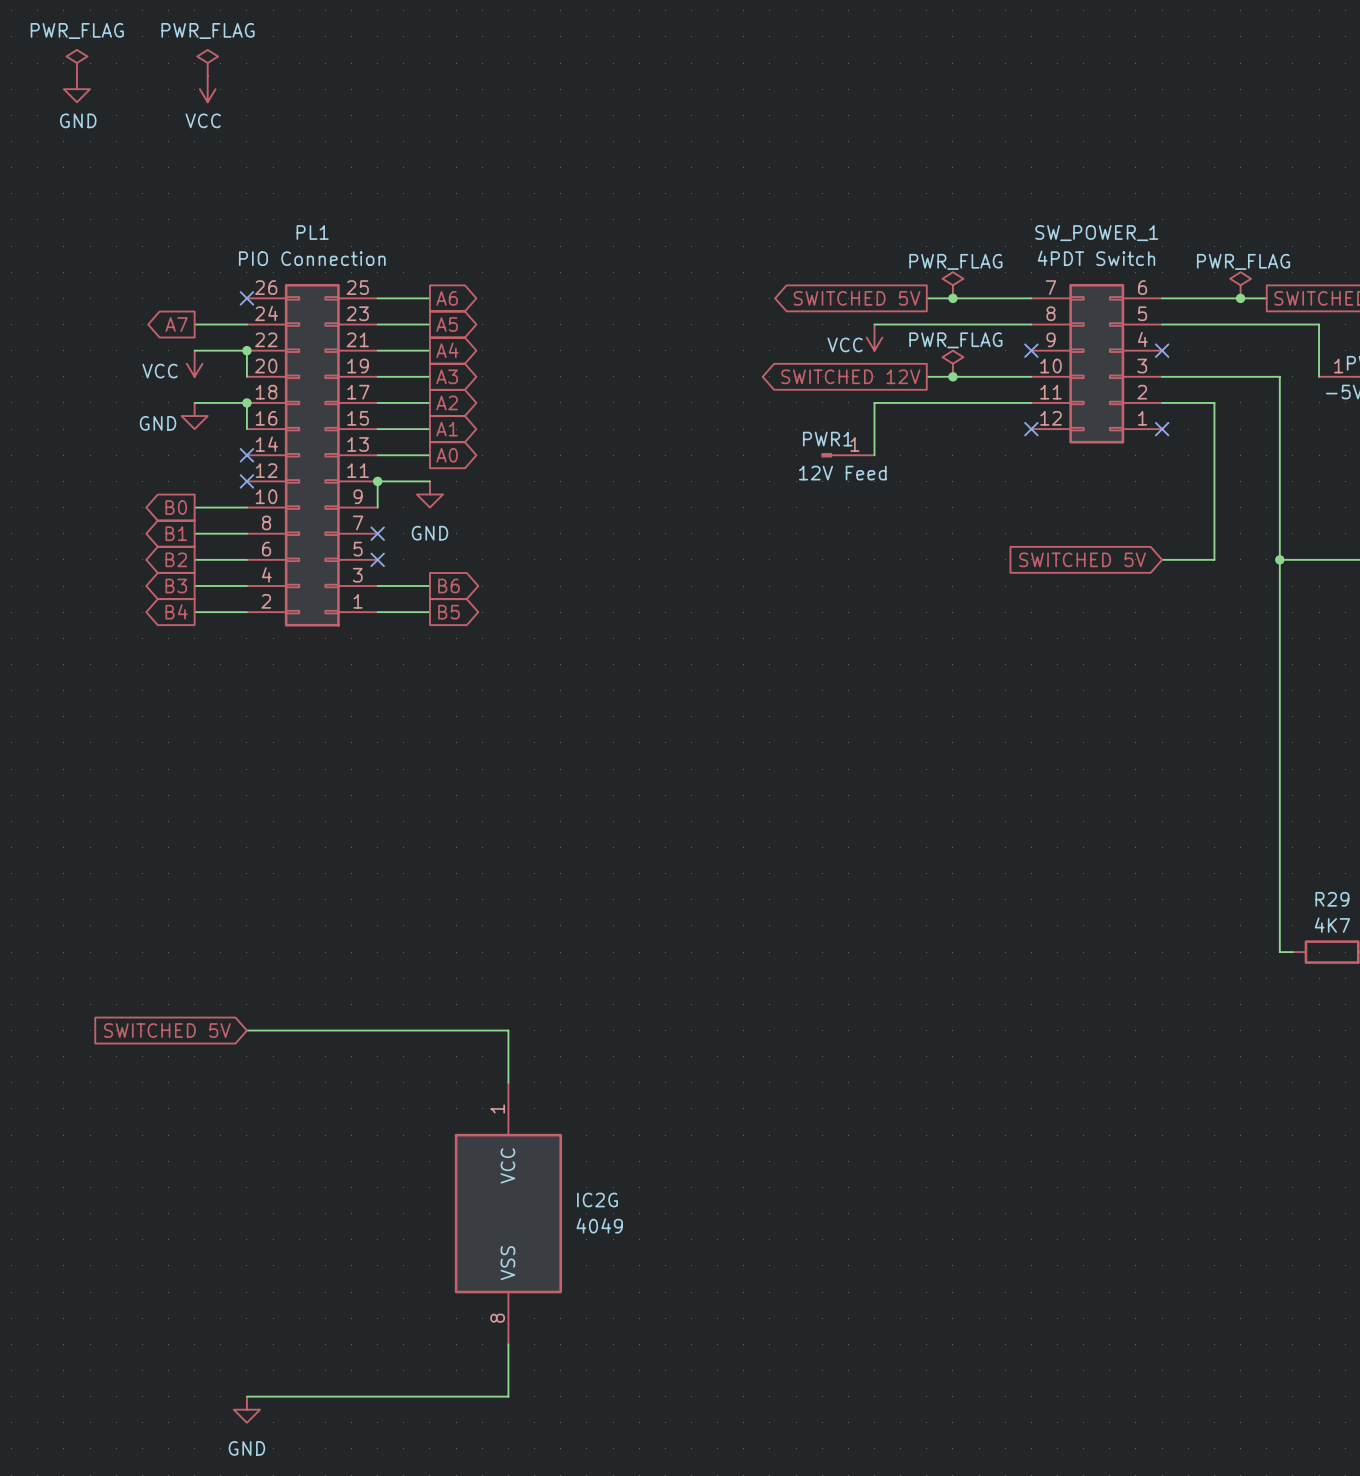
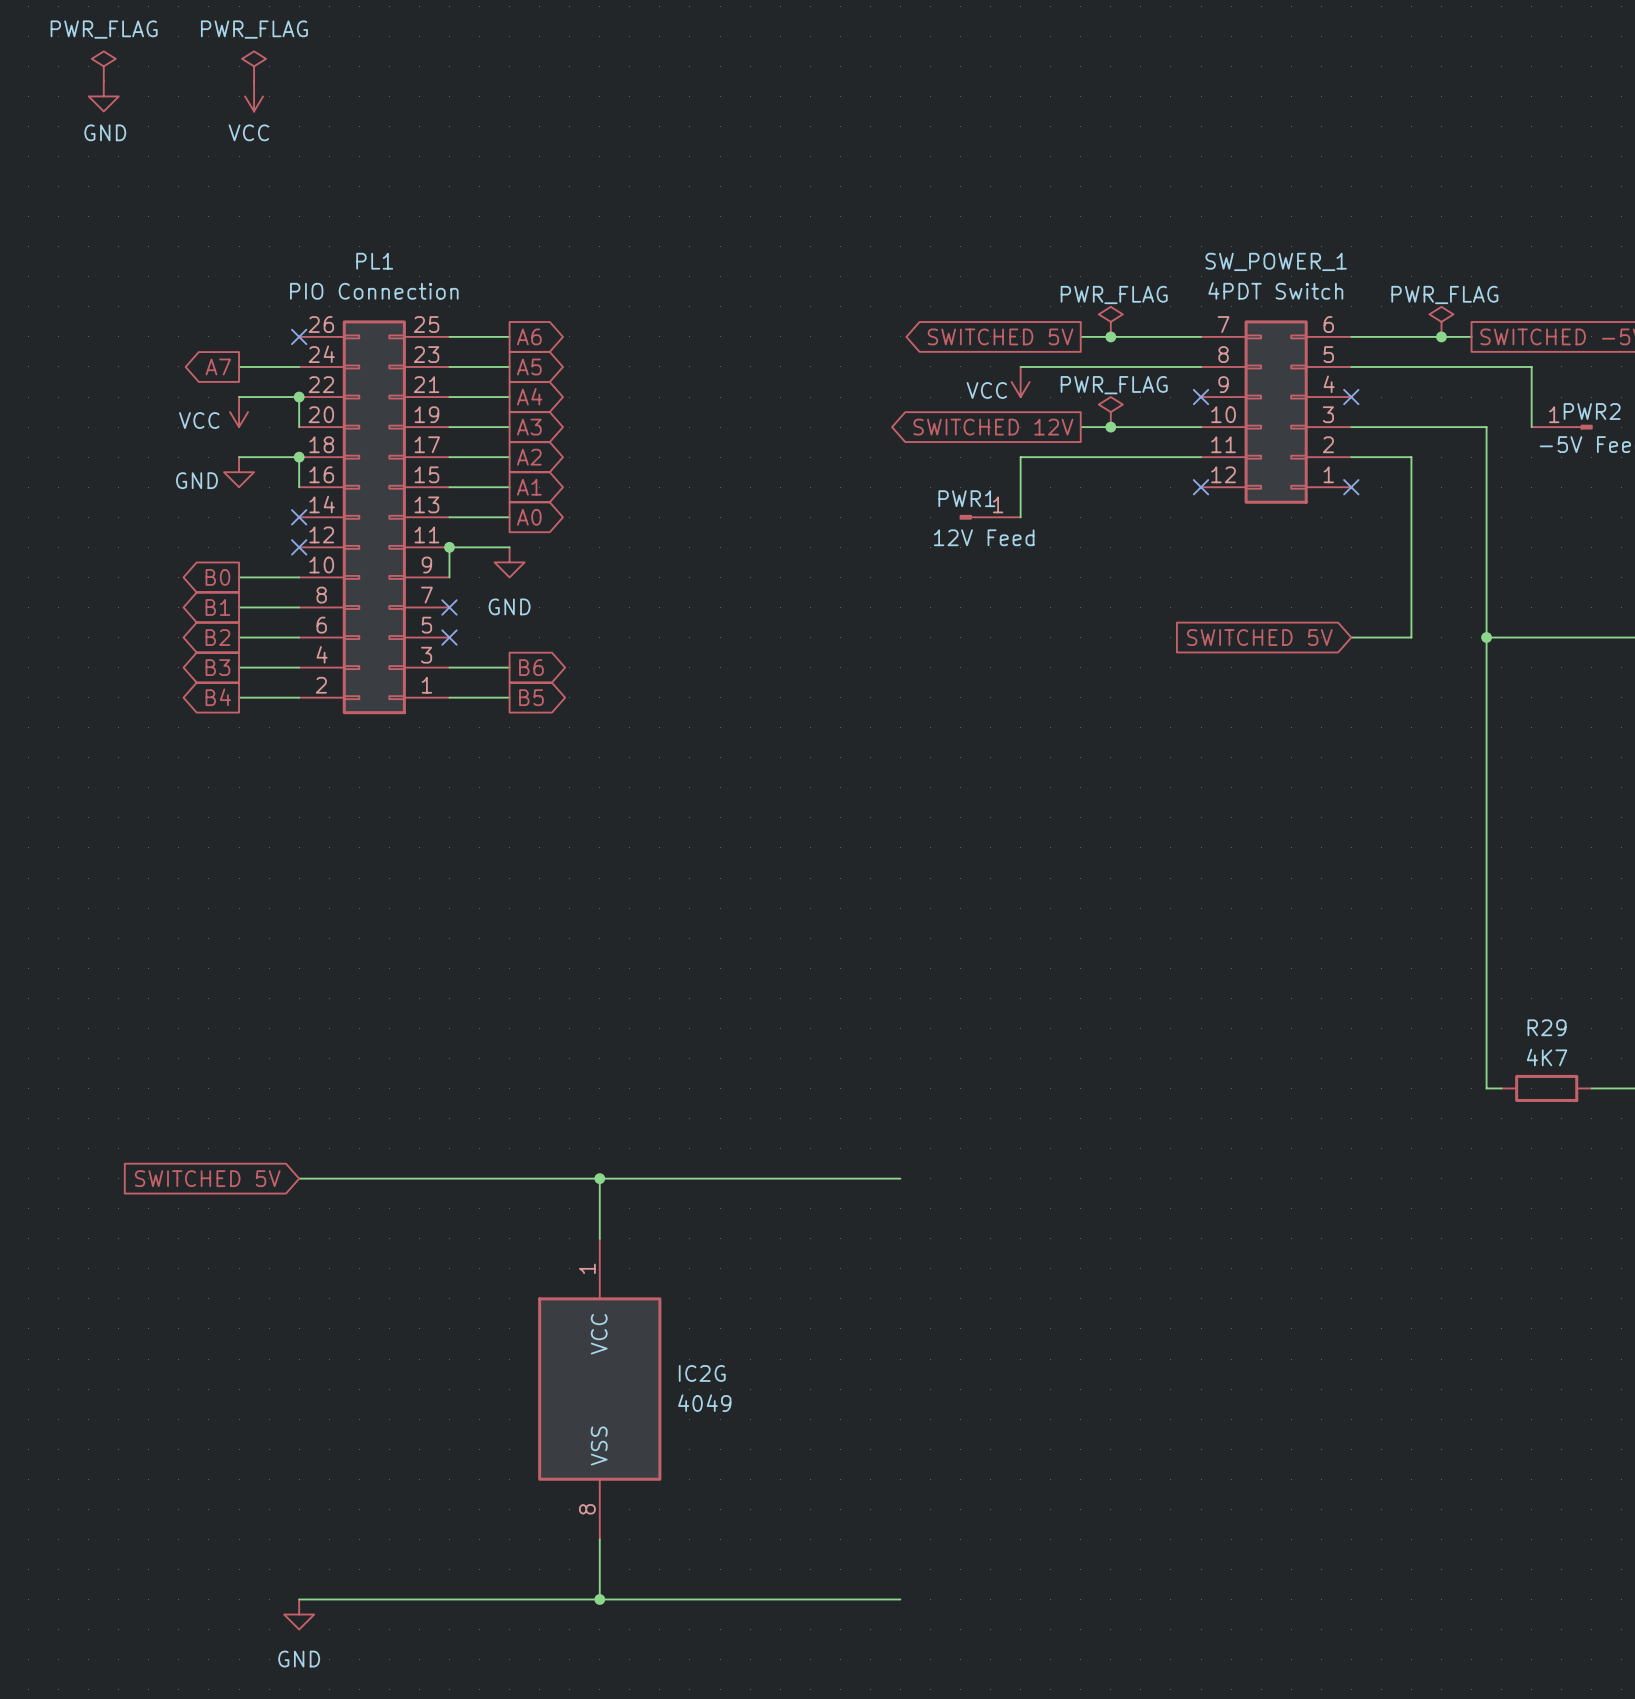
wire: none -> (599, 1178) (900, 1178)
junction: none -> (599, 1178)
wire: none -> (599, 1599) (900, 1599)
junction: none -> (599, 1599)

